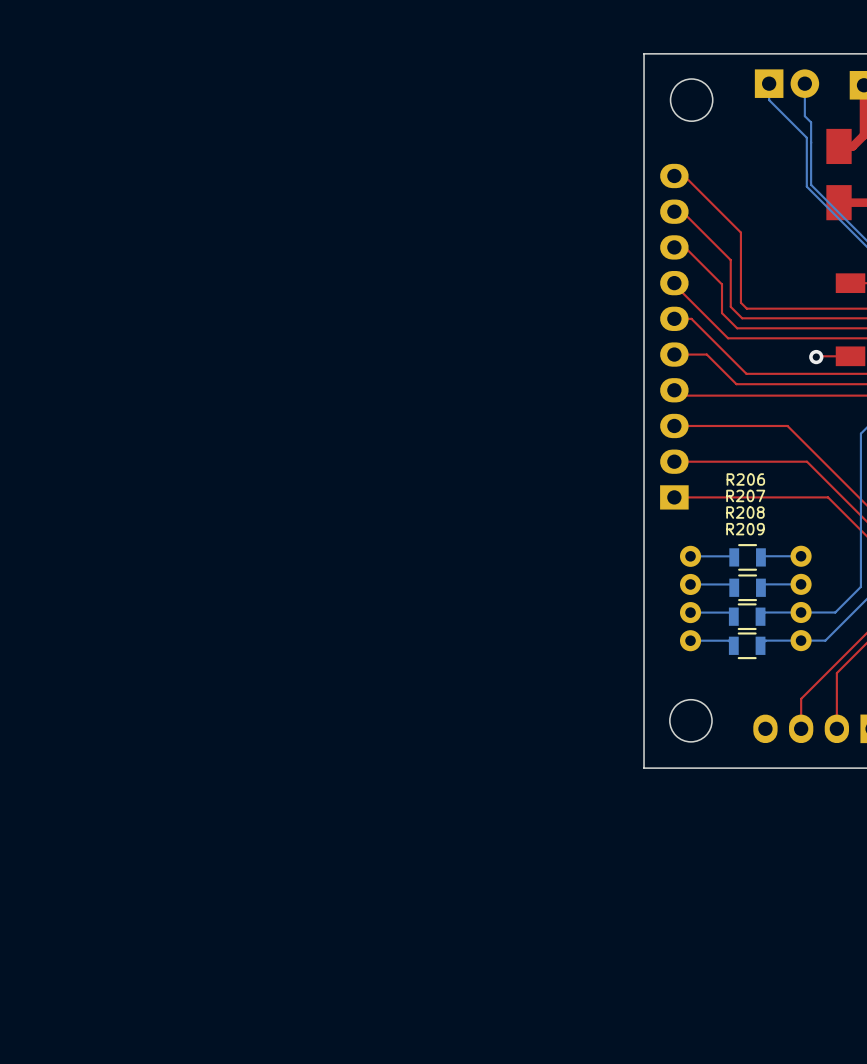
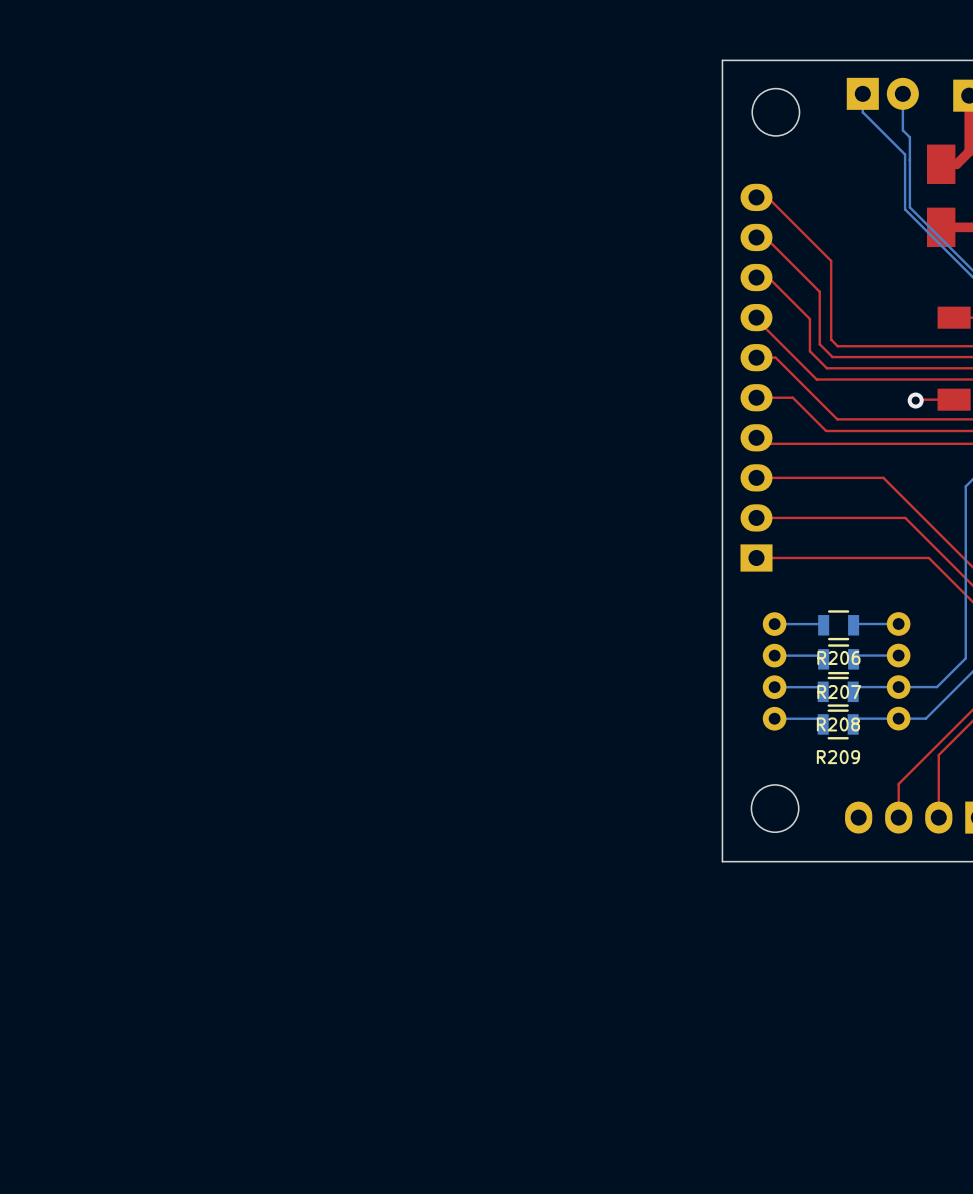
R206 name position: R206 (745, 479) -> R206 (838, 657)
R207 name position: R207 (745, 495) -> R207 (839, 692)
R208 name position: R208 (745, 512) -> R208 (838, 724)
R209 name position: R209 (745, 529) -> R209 (838, 757)

